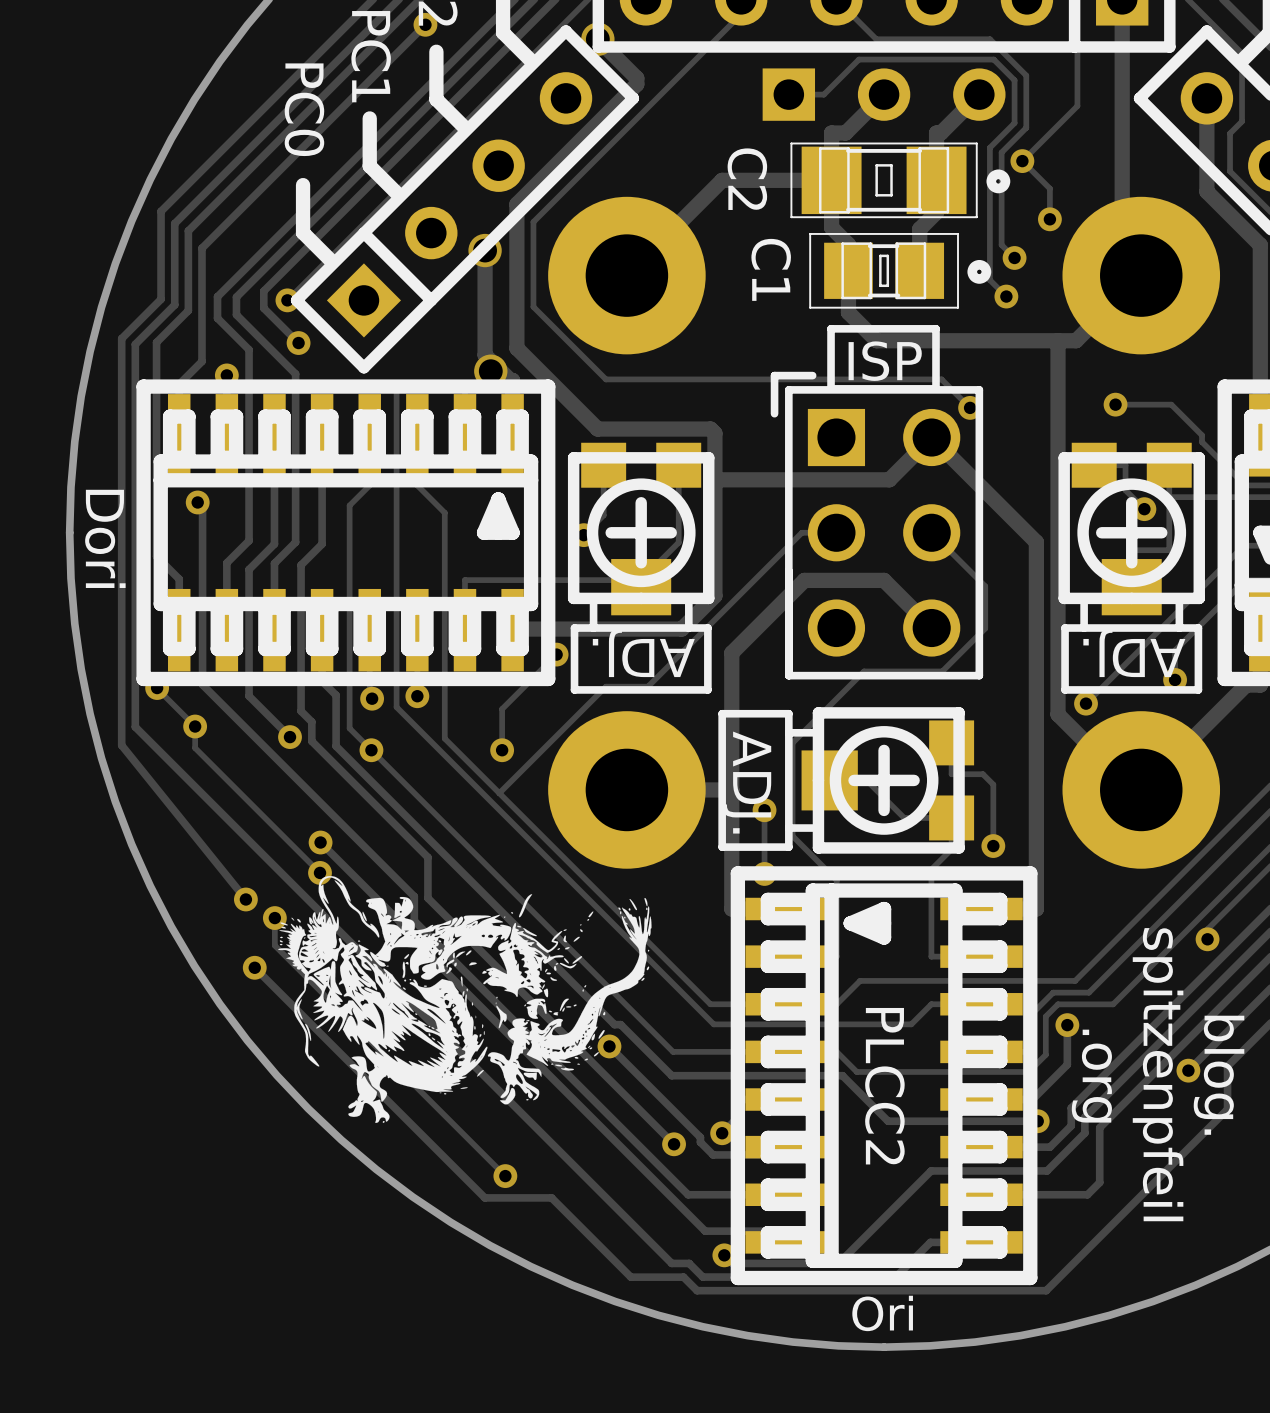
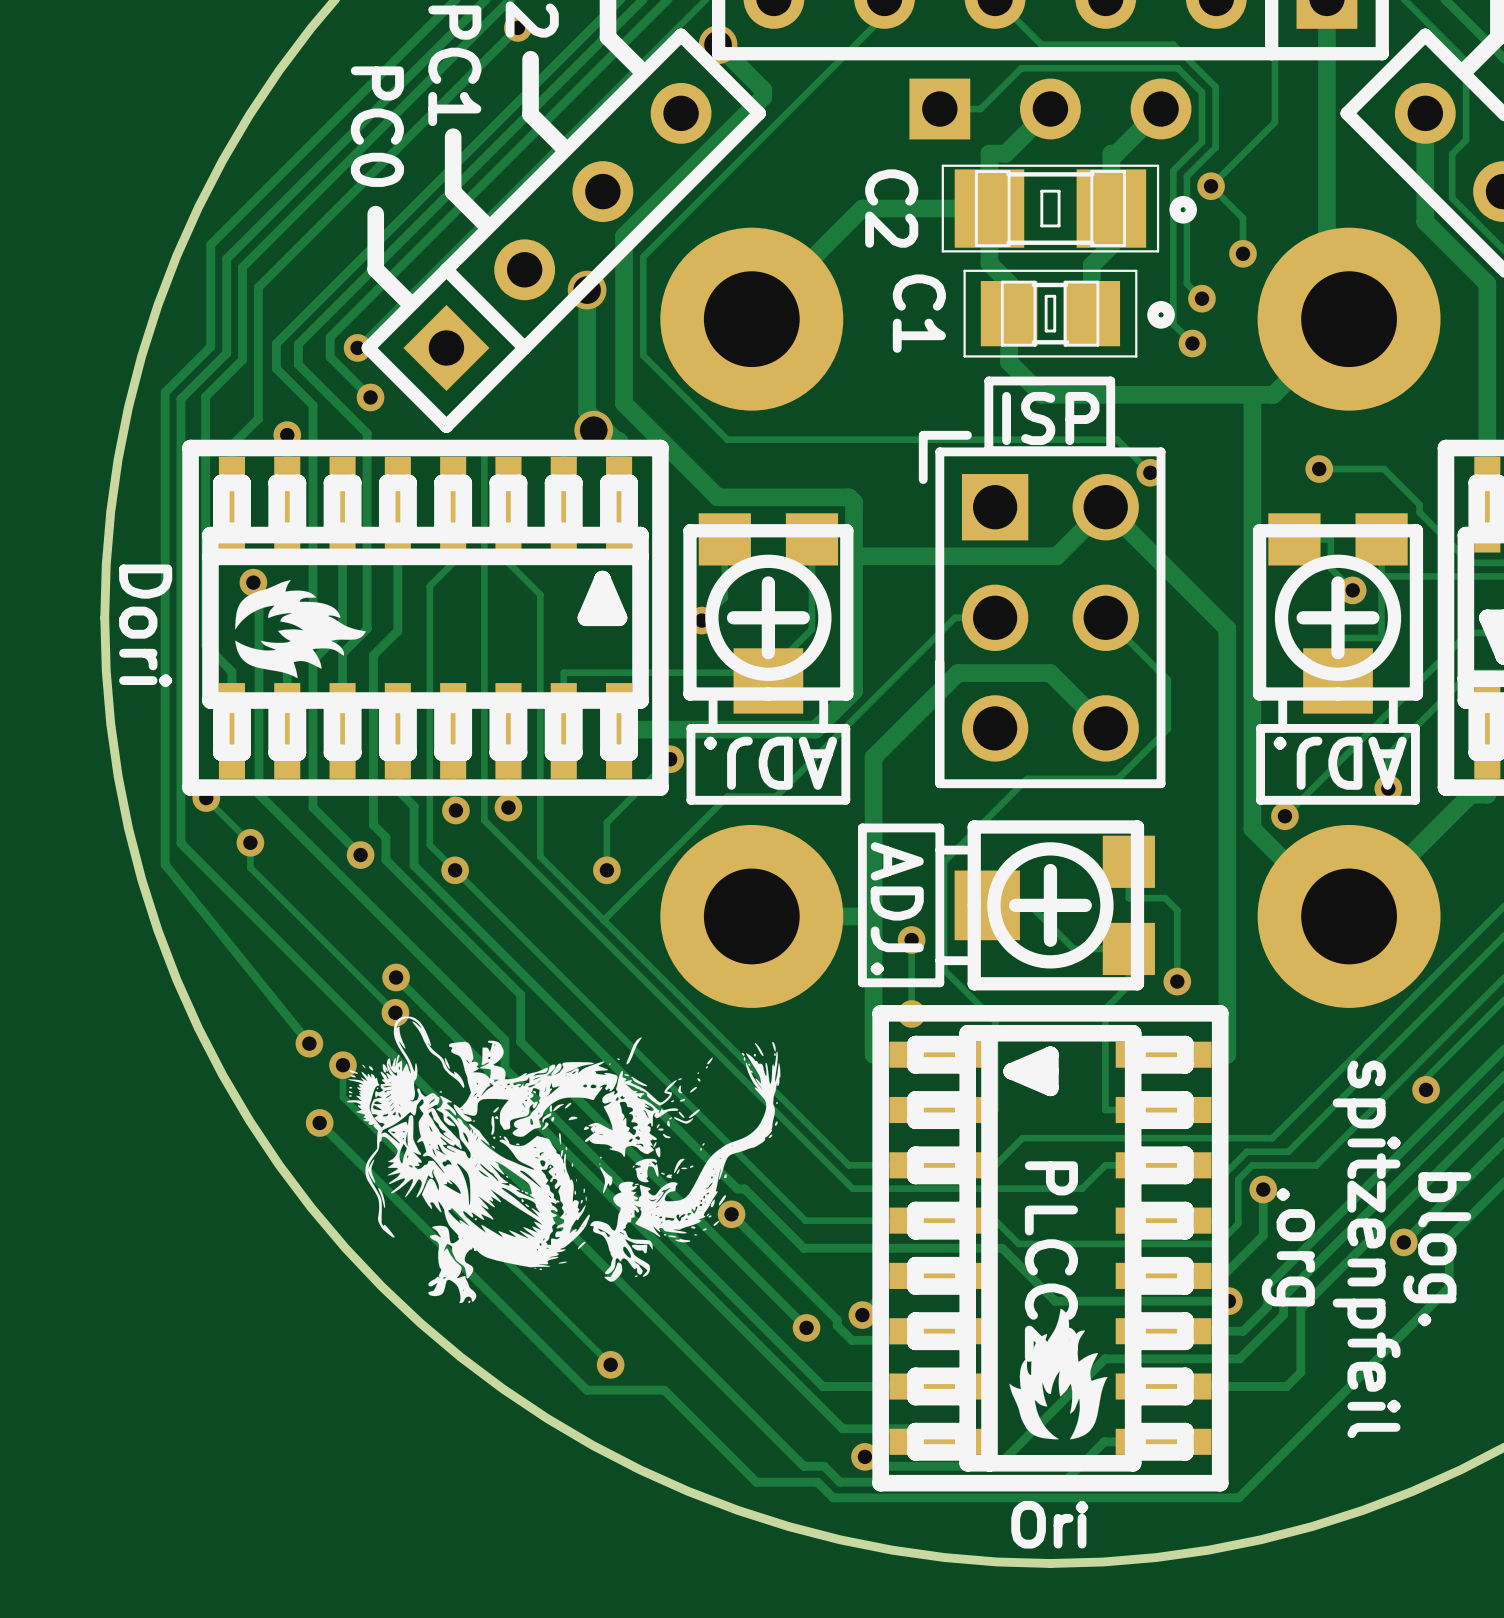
drawing: none -> [235, 580, 366, 679]
drawing: none -> [1009, 1308, 1108, 1440]

